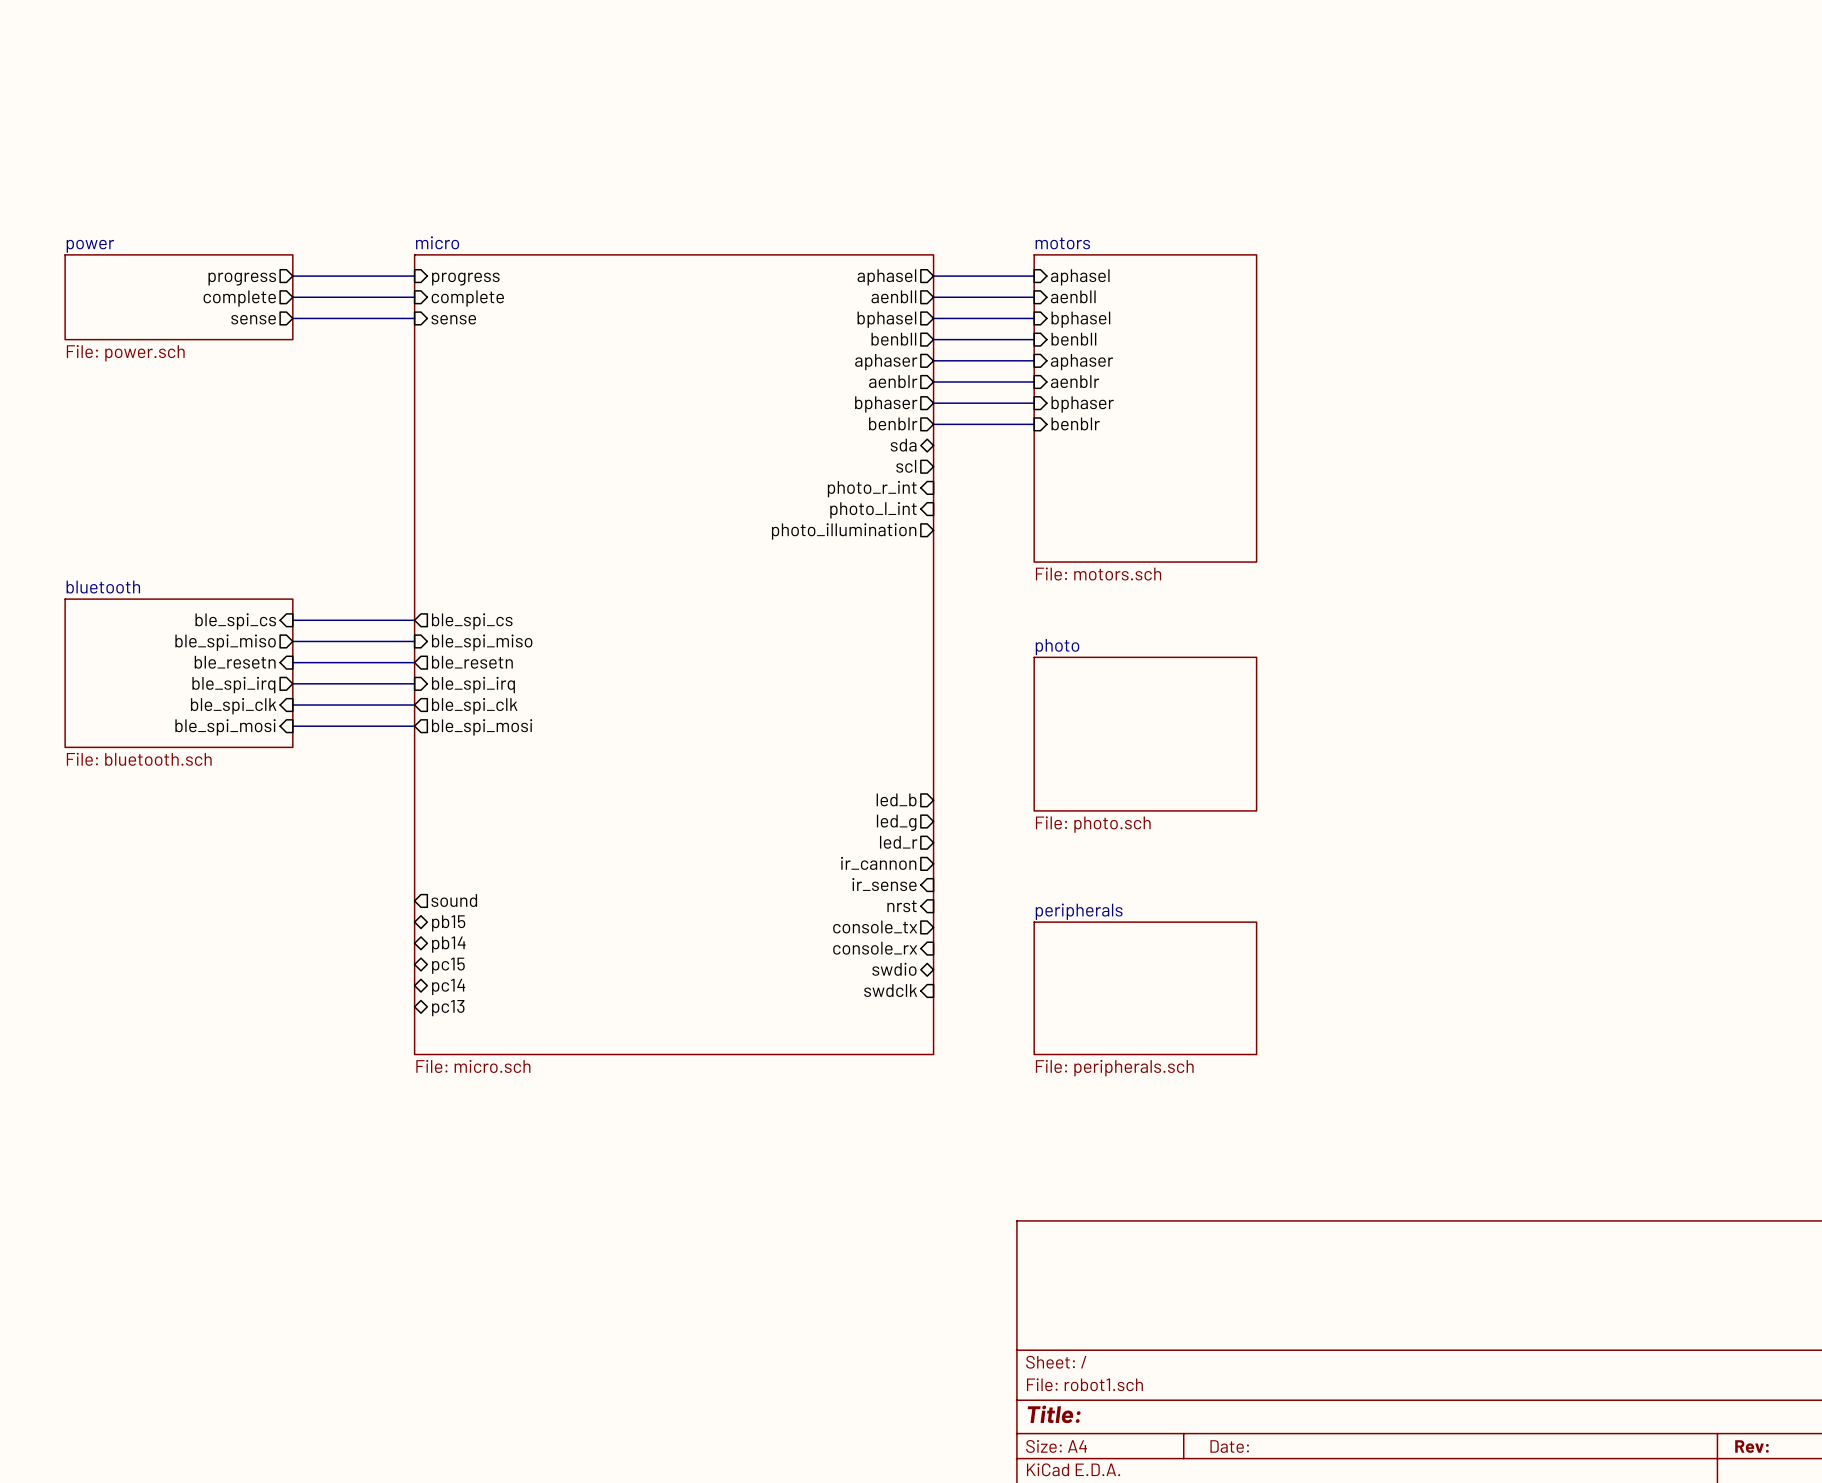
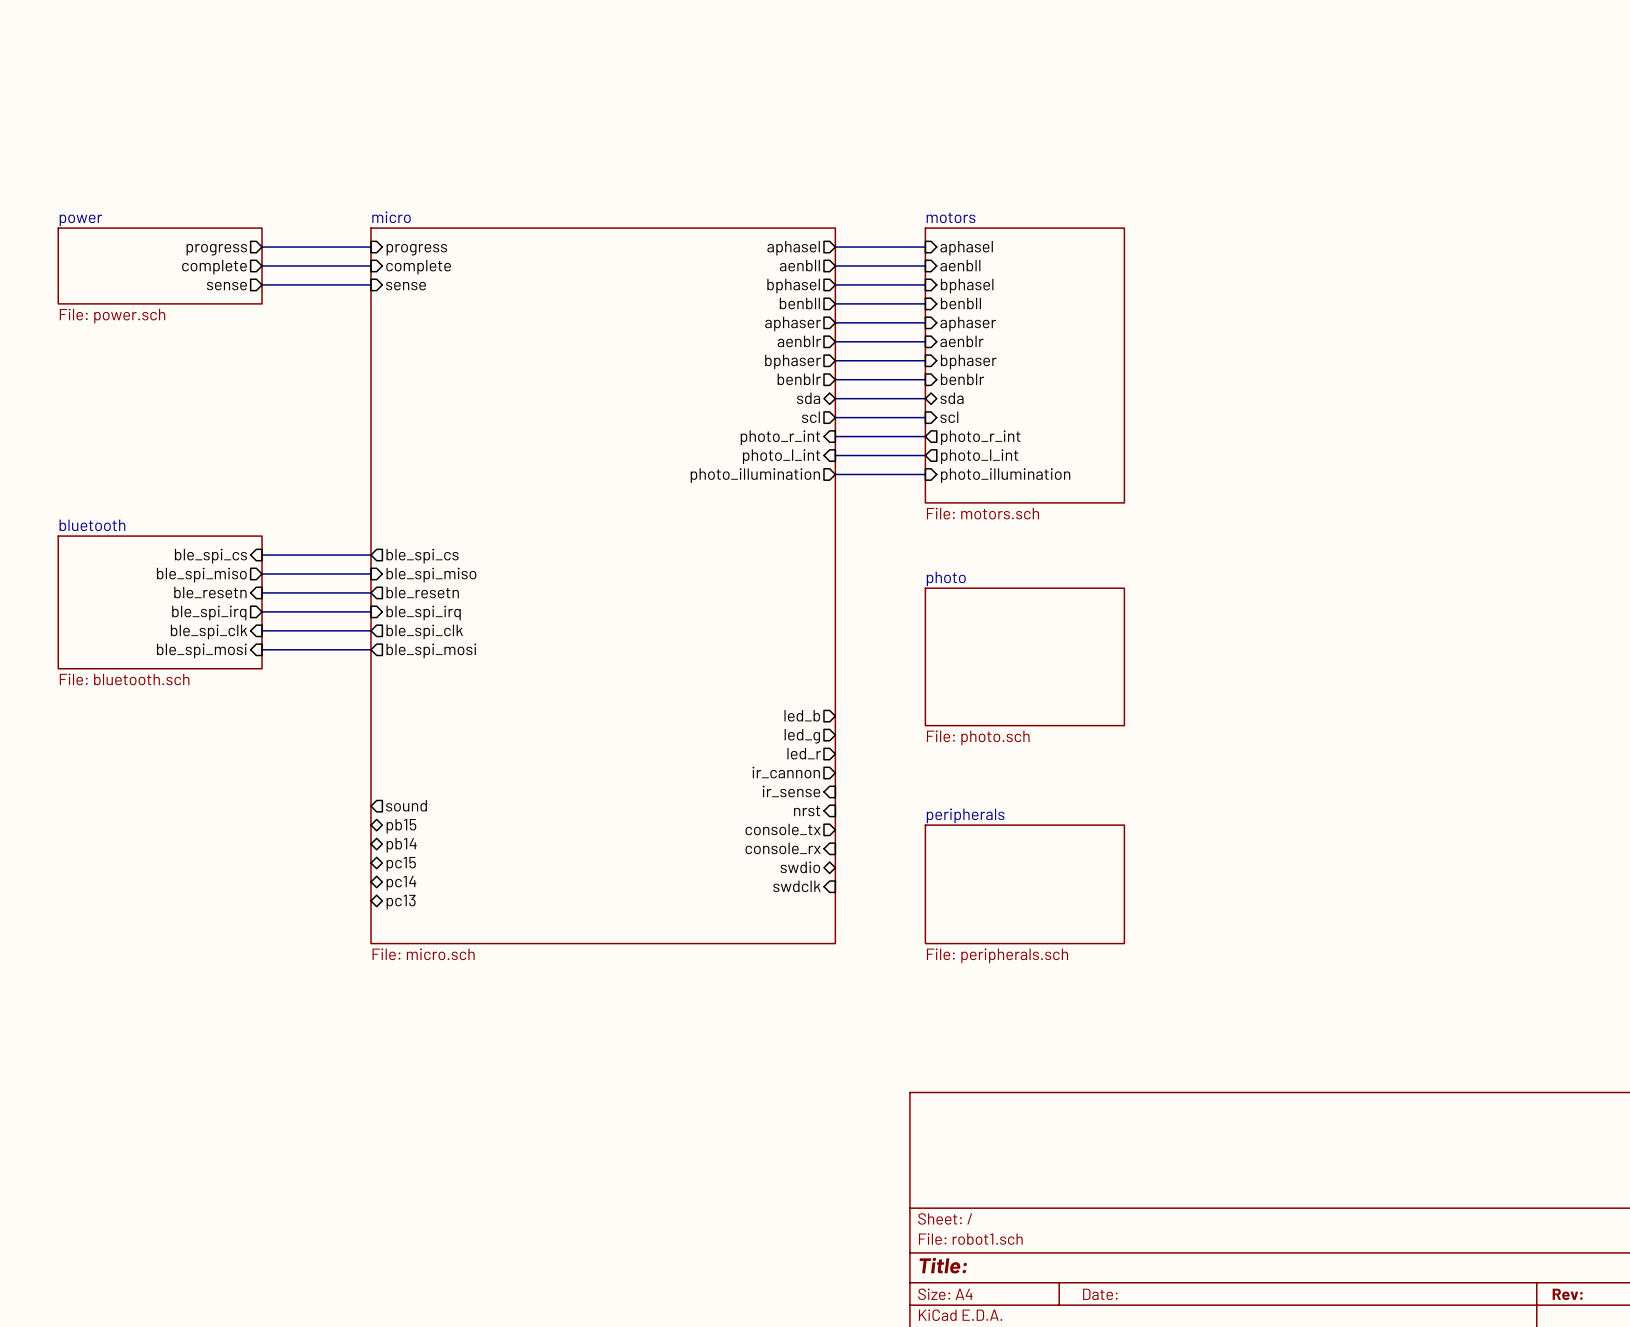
wire: none -> (835, 398) (925, 398)
sheet pin: none -> sda (952, 398)
wire: none -> (835, 417) (925, 417)
sheet pin: none -> scl (949, 417)
wire: none -> (835, 436) (925, 436)
sheet pin: none -> photo_r_int (980, 437)
wire: none -> (835, 455) (925, 455)
sheet pin: none -> photo_l_int (979, 456)
wire: none -> (835, 474) (925, 474)
sheet pin: none -> photo_illumination (1005, 475)

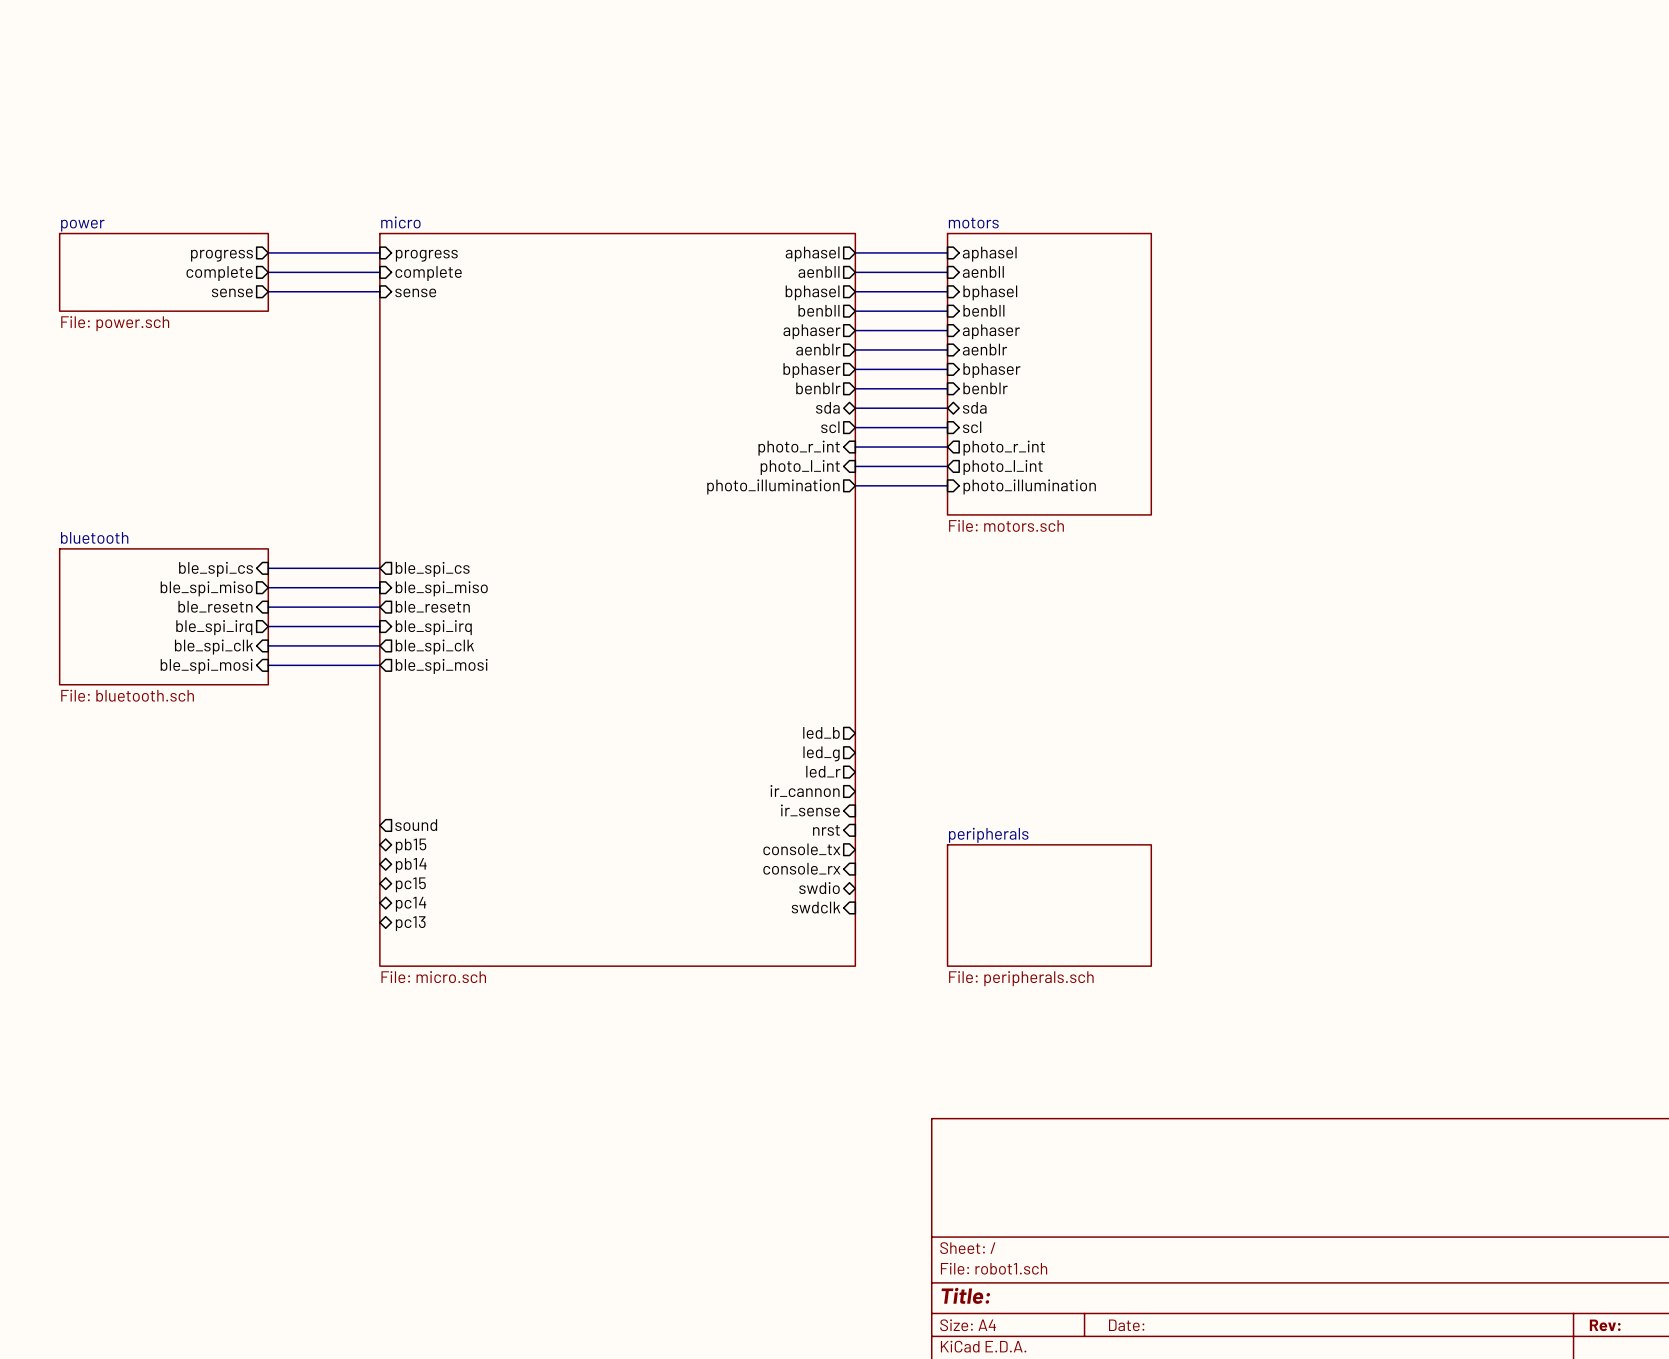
sheet photo: File: photo.sch (1024, 656) -> none

